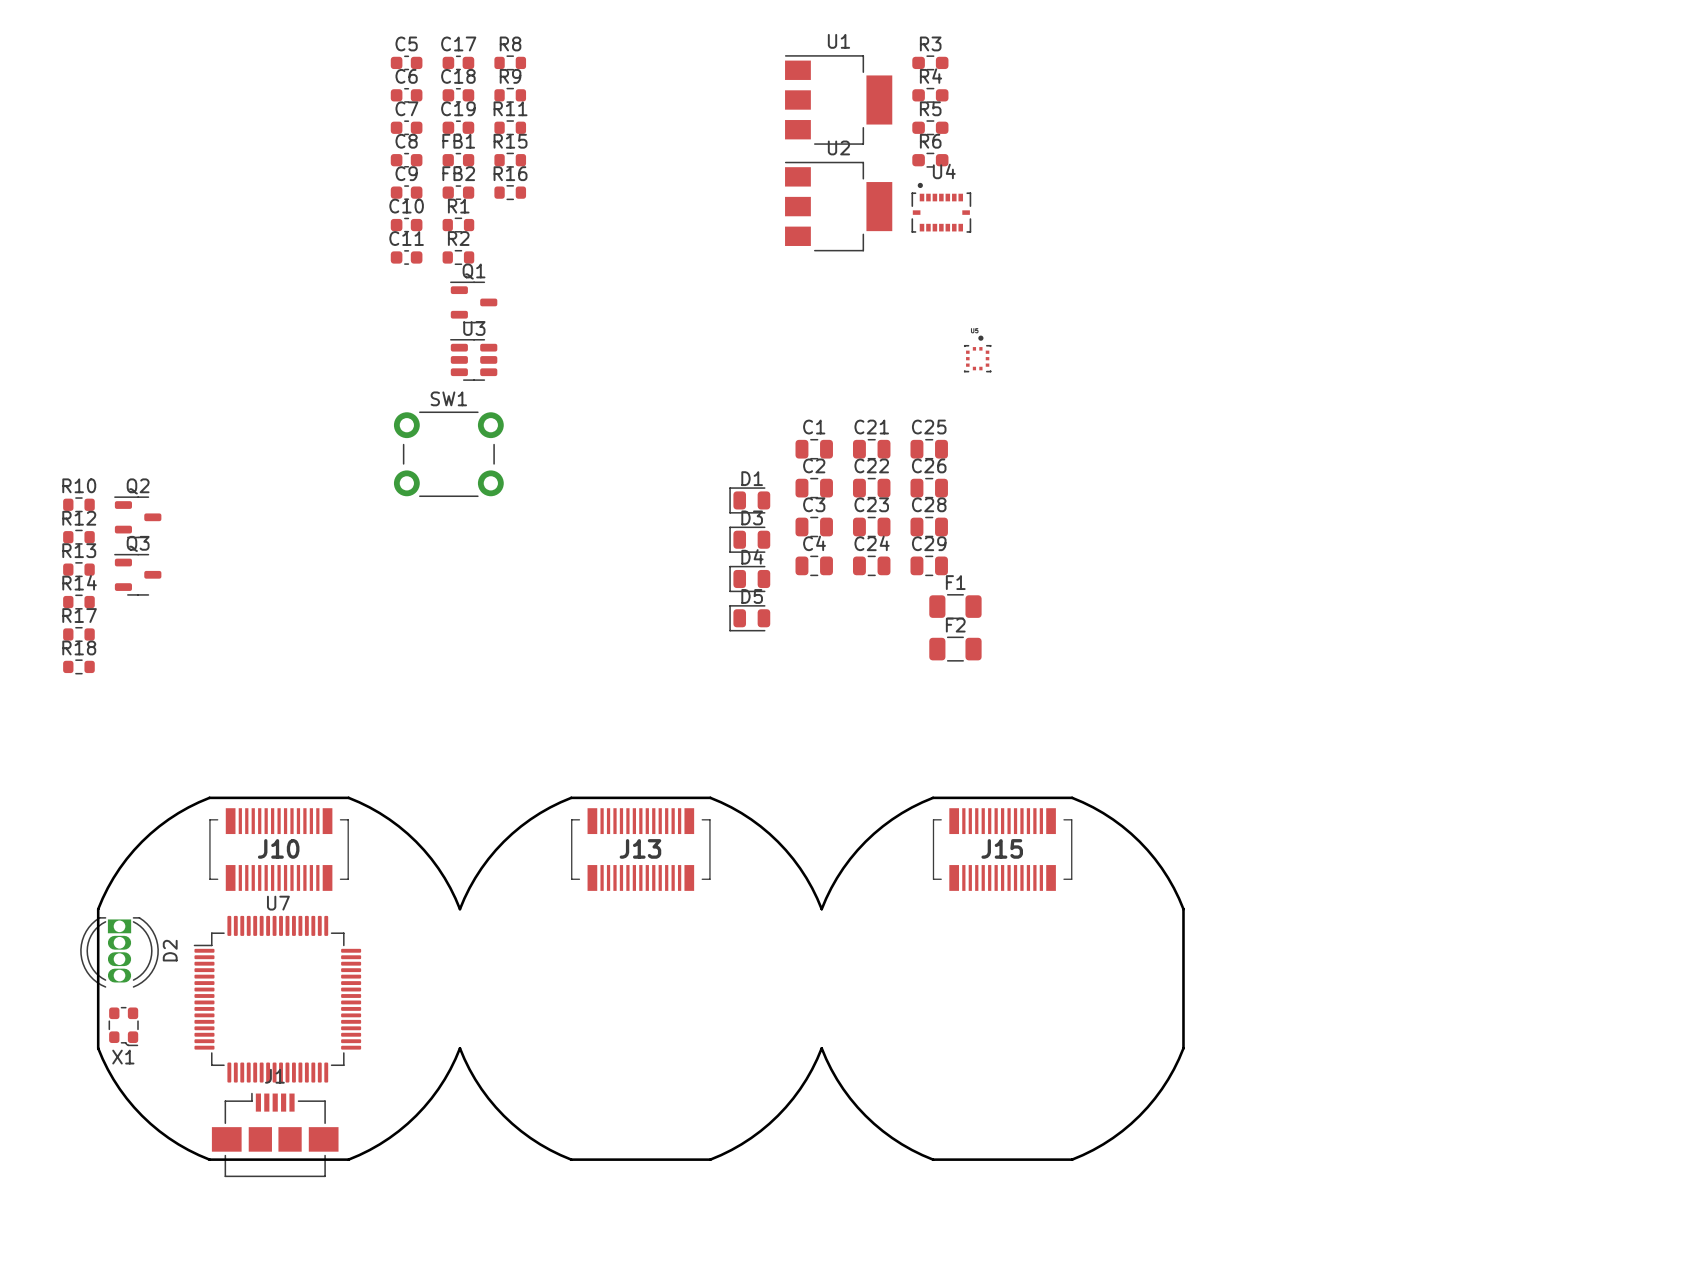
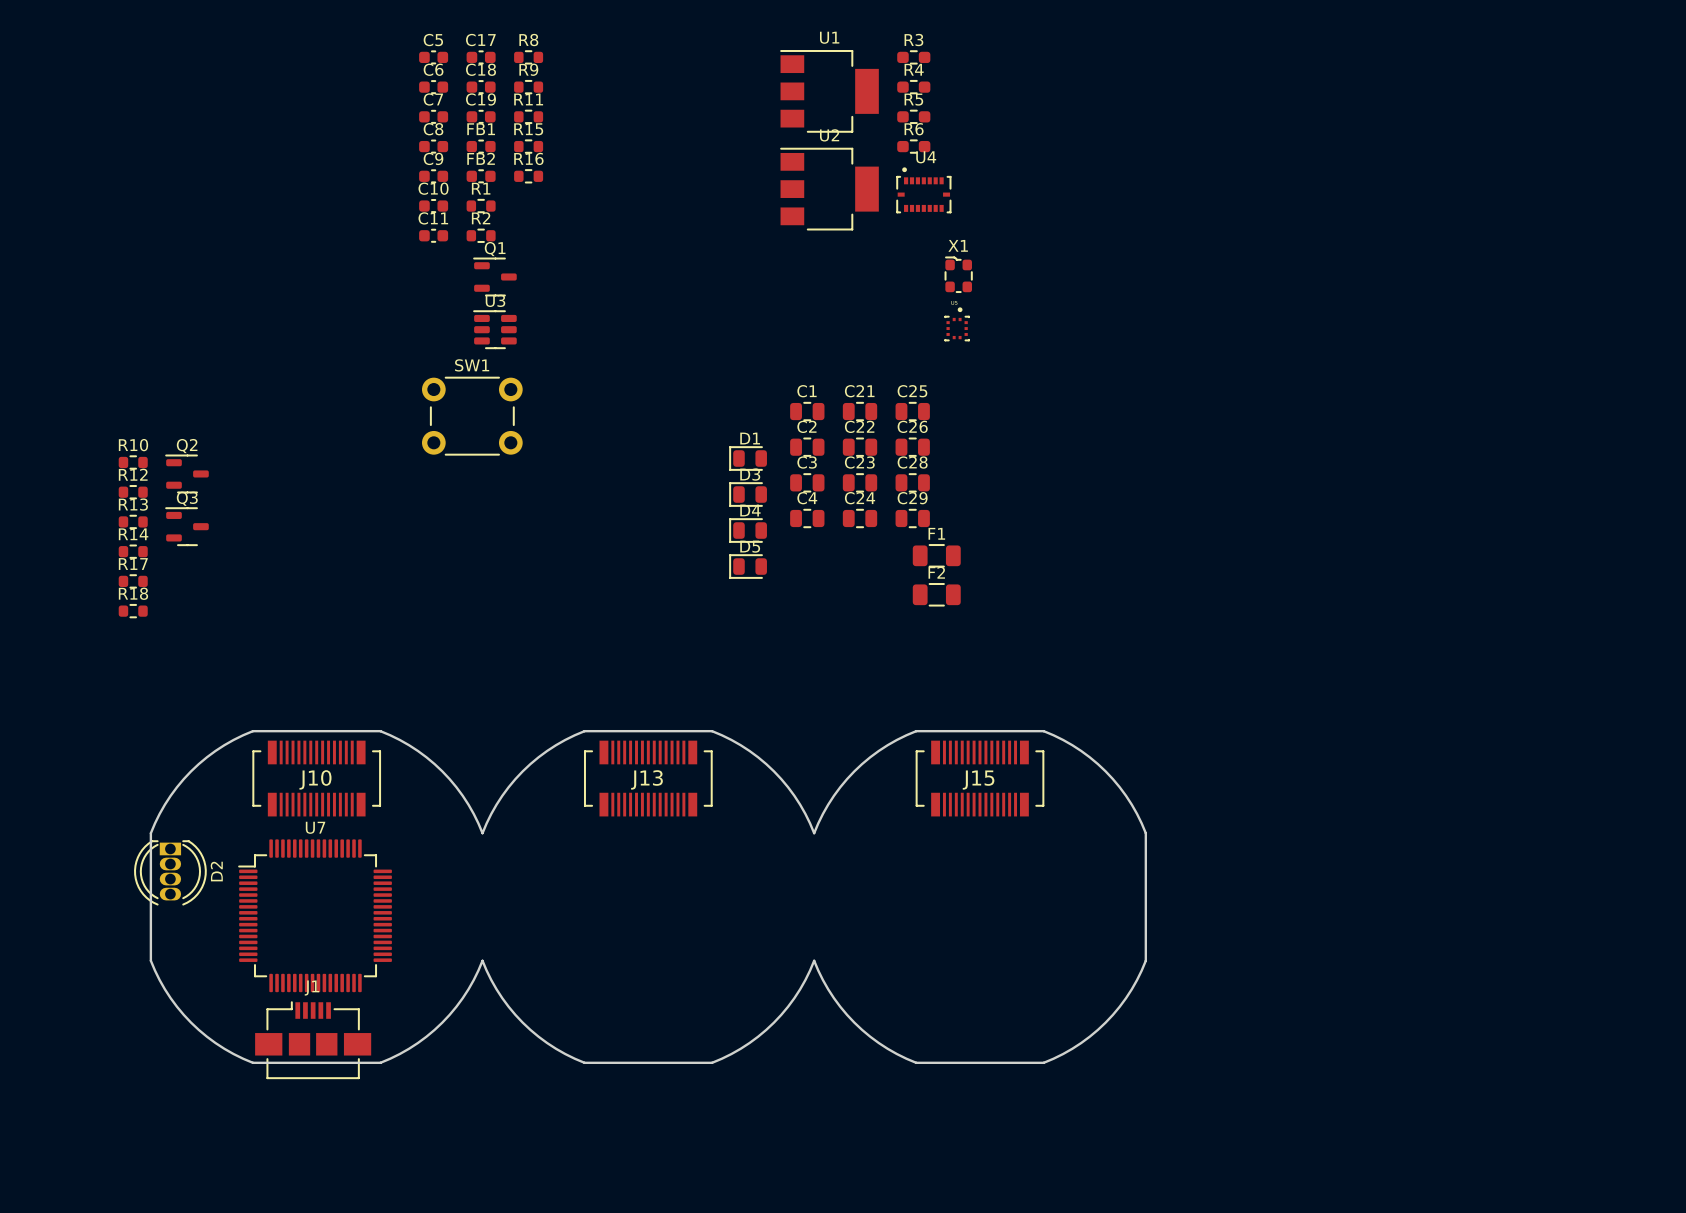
X1 rotation: 0° (123, 1026) -> 180° (958, 274)
X1 position: (123, 1026) -> (958, 274)

